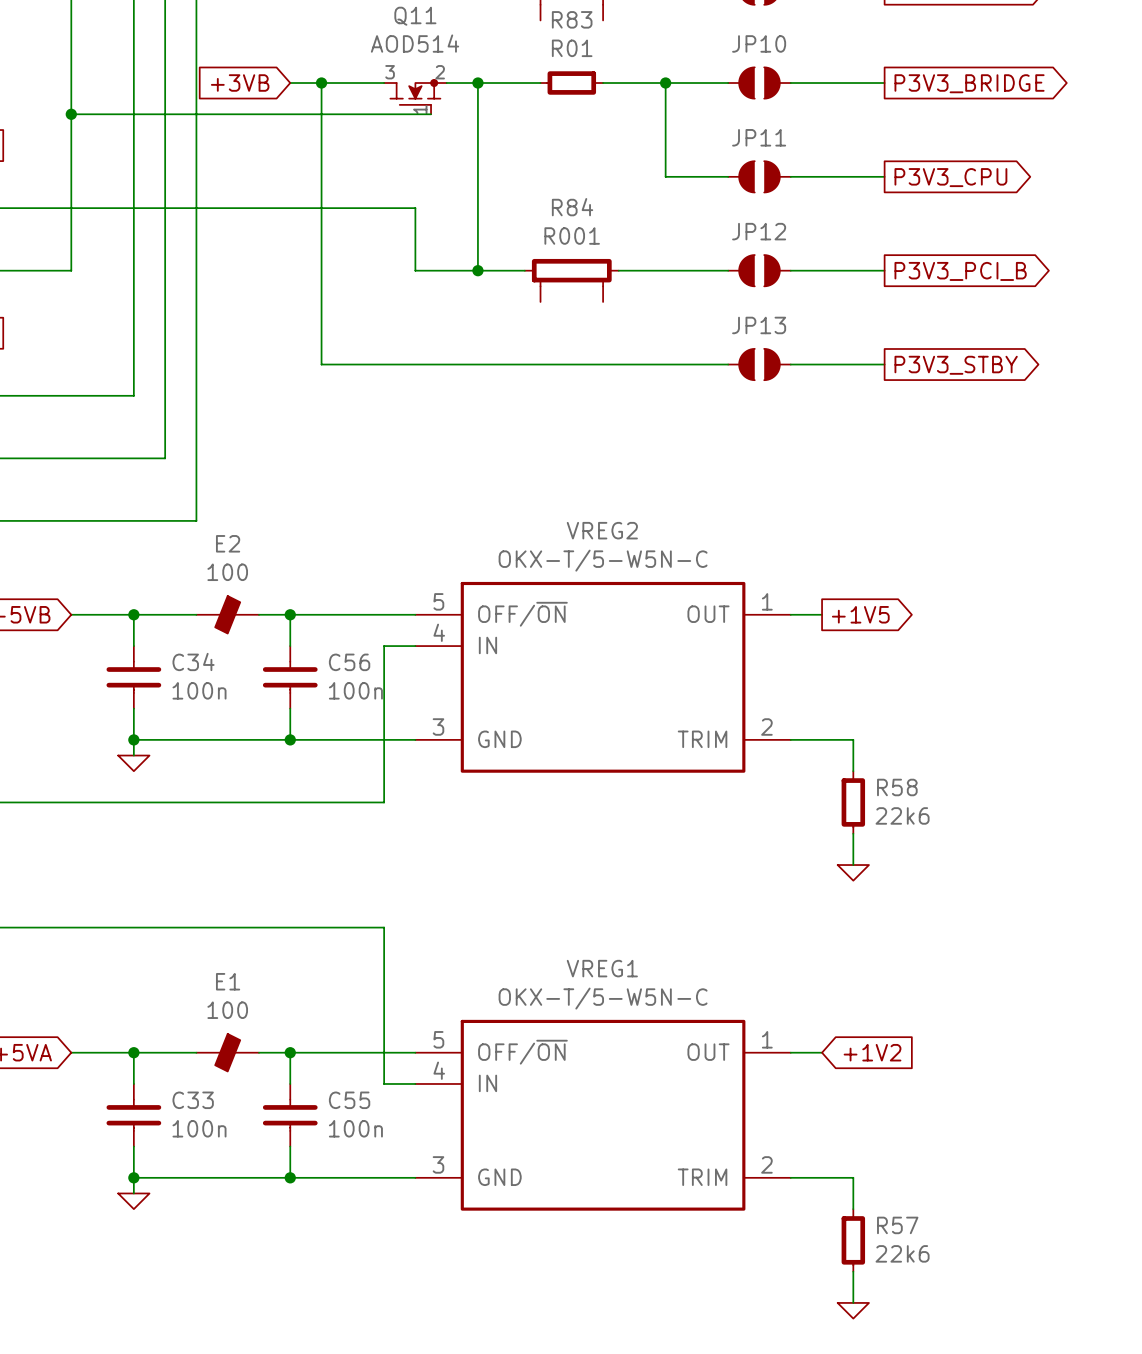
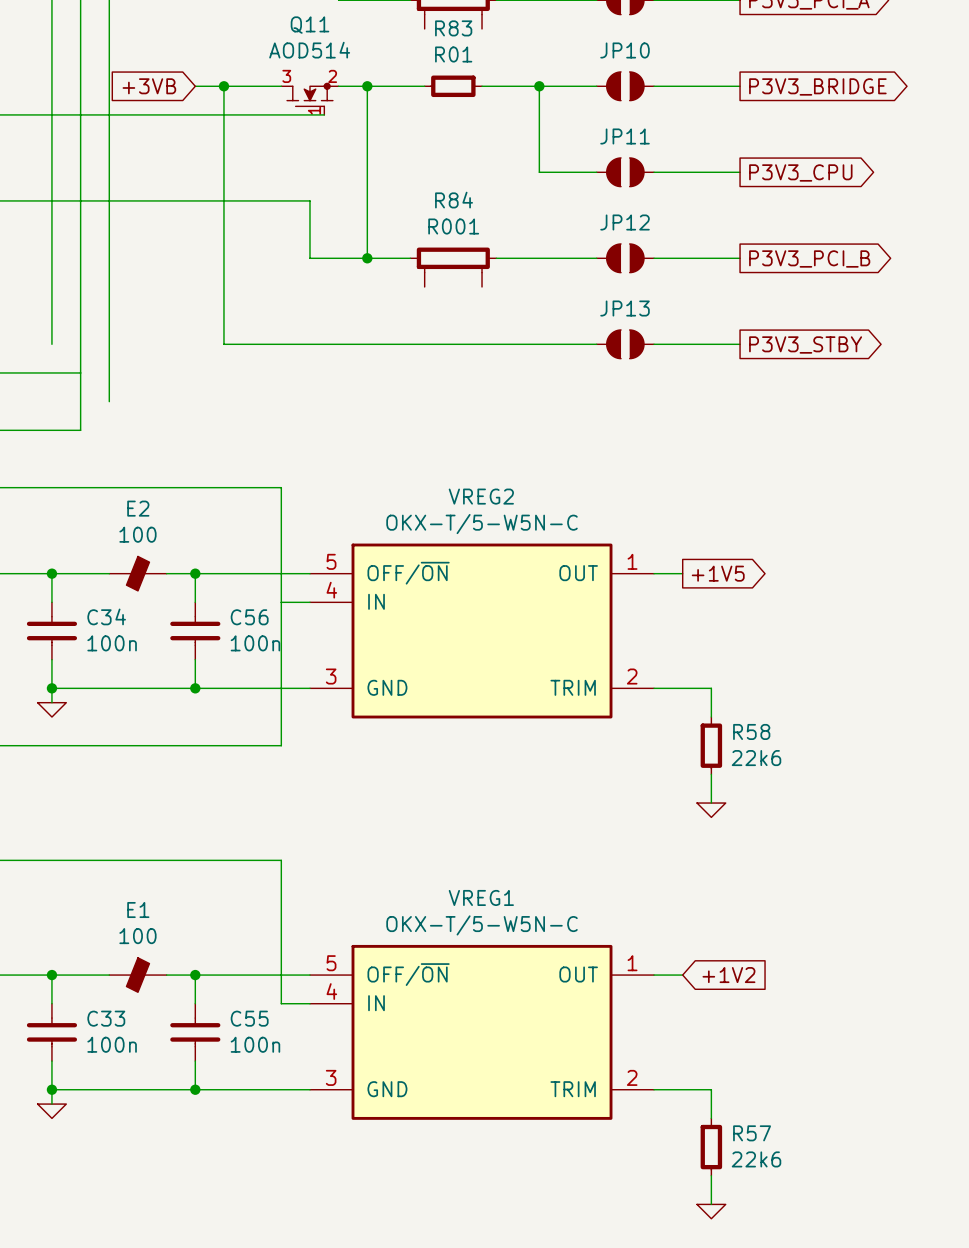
wire: (133, 364) (133, 395) -> (80, 372) (51, 372)
wire: (196, 427) (196, 520) -> (281, 602) (281, 487) (109, 487)

